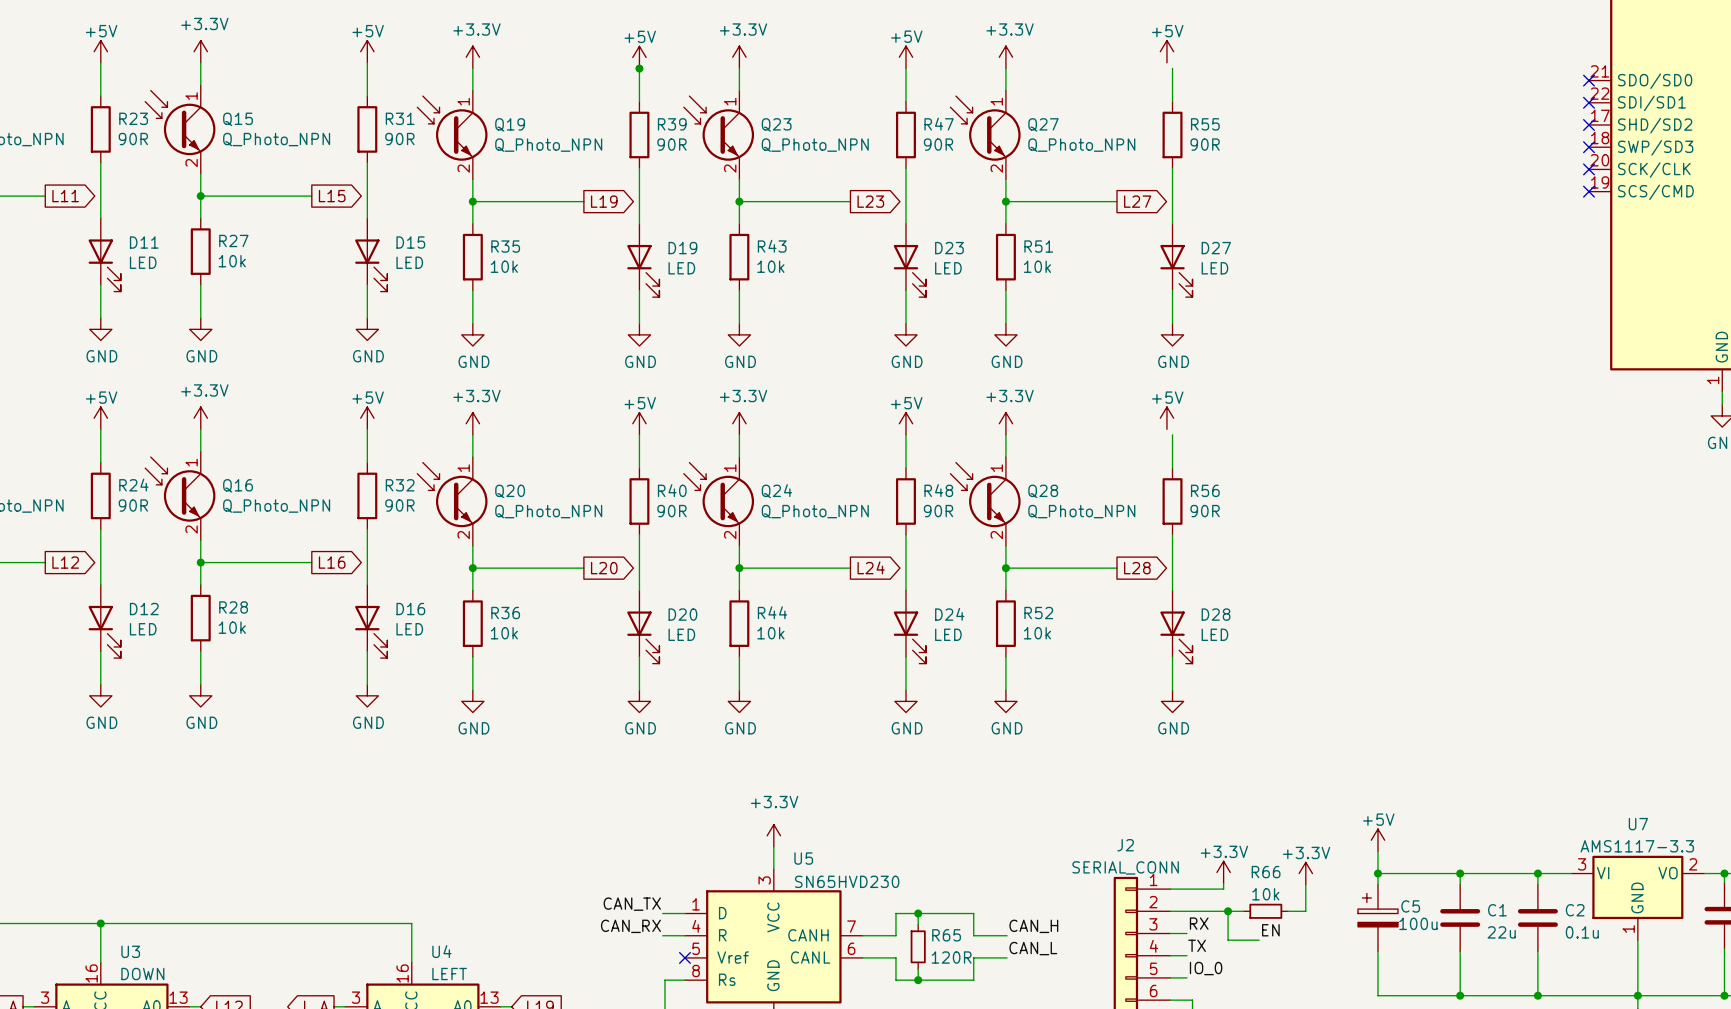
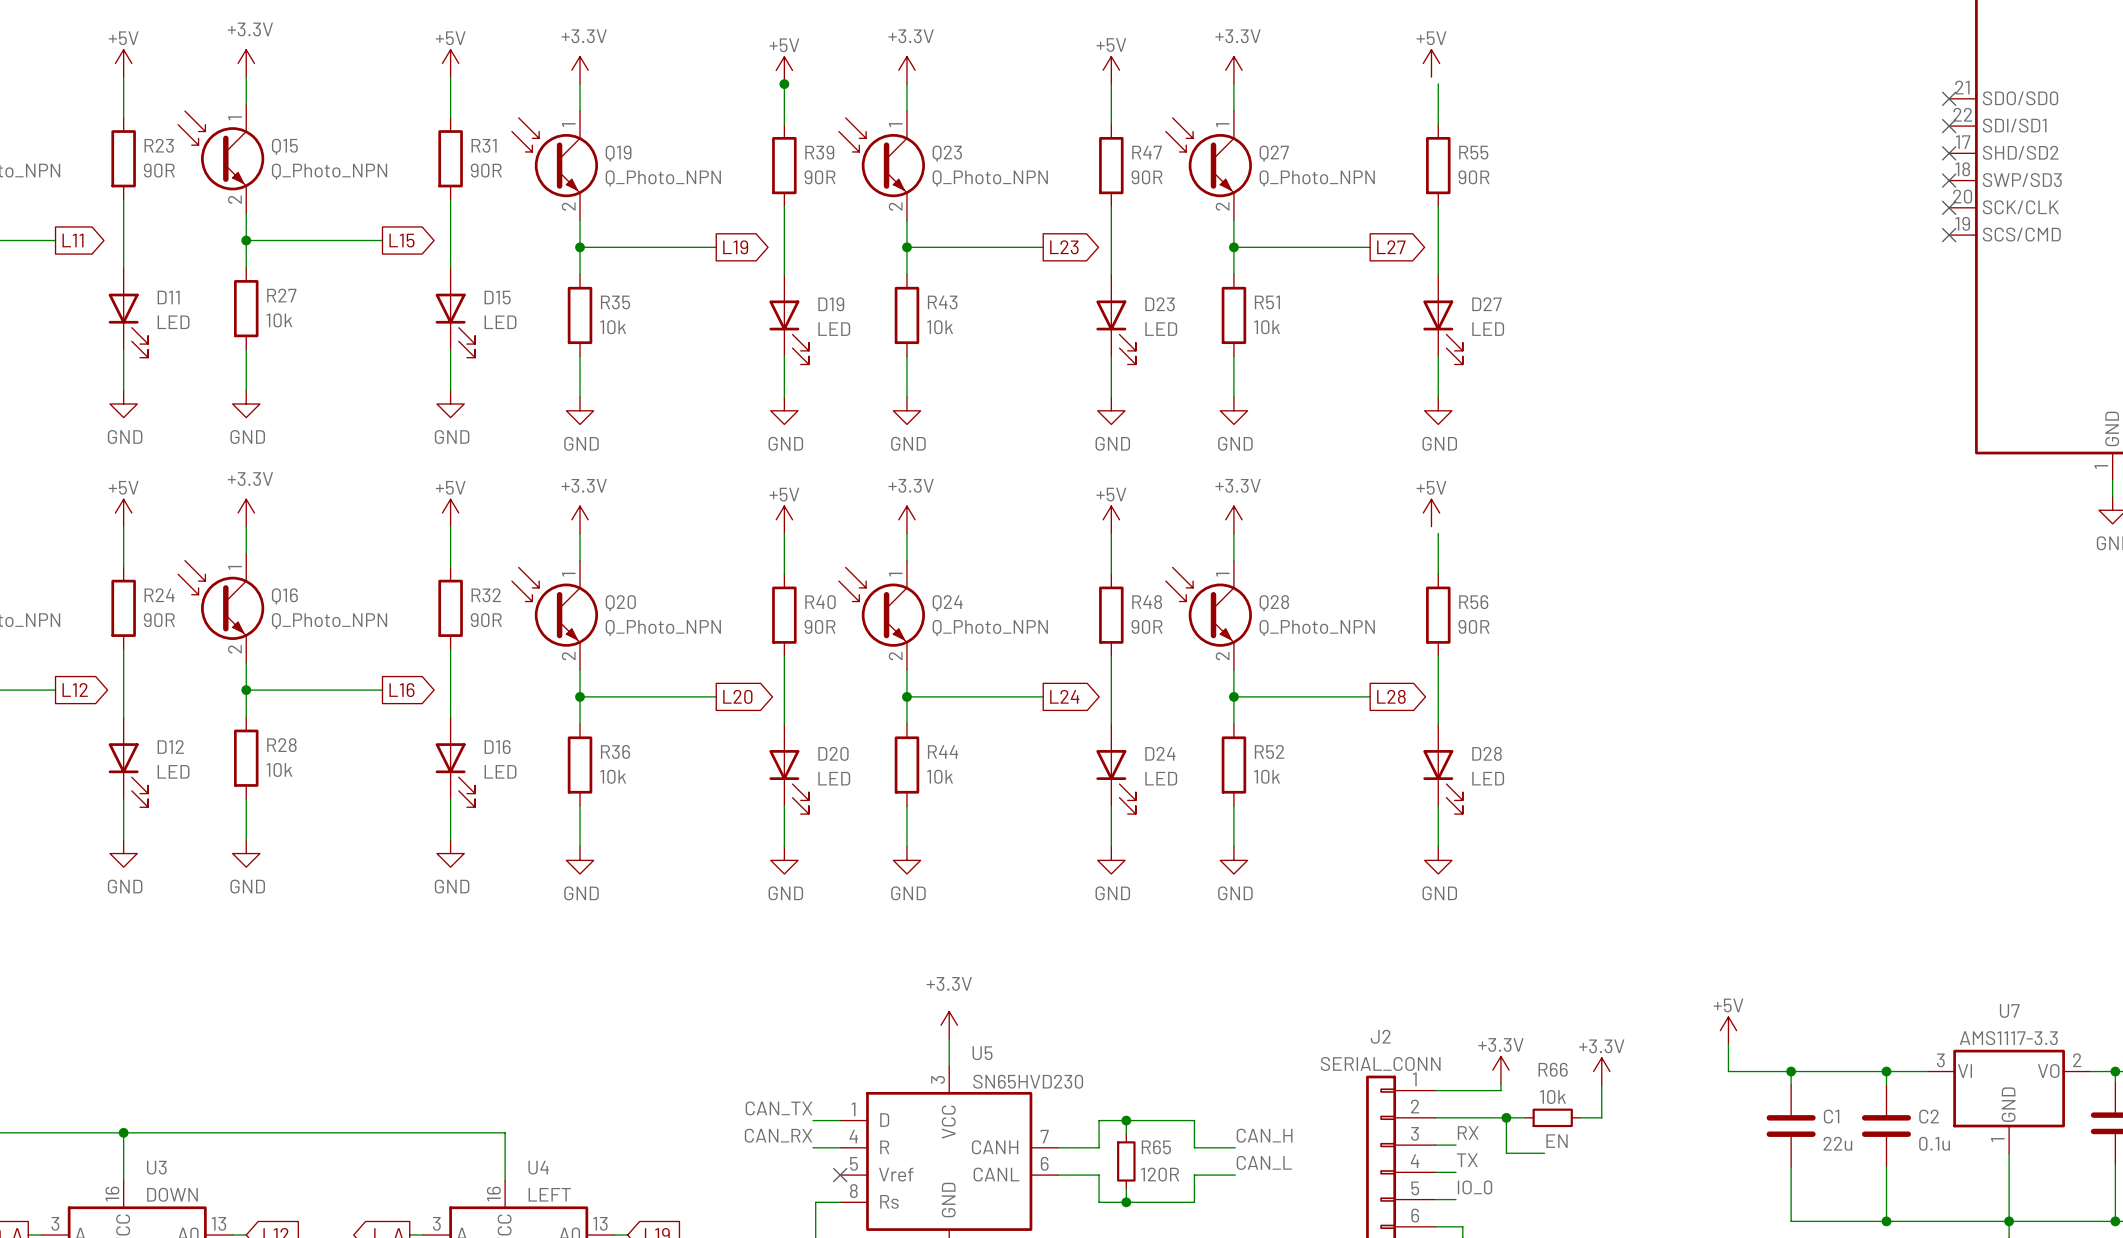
power symbol position: +5V (1377, 840) -> +5V (1728, 1030)
wire: (1377, 851) (1377, 884) -> none
wire: (1377, 873) (1409, 873) -> (1728, 1044) (1728, 1071)
junction: (1377, 873) -> none
C5: 100u (1377, 917) -> none
wire: (1377, 951) (1377, 995) (1460, 995) -> none
junction: (1460, 995) -> none

